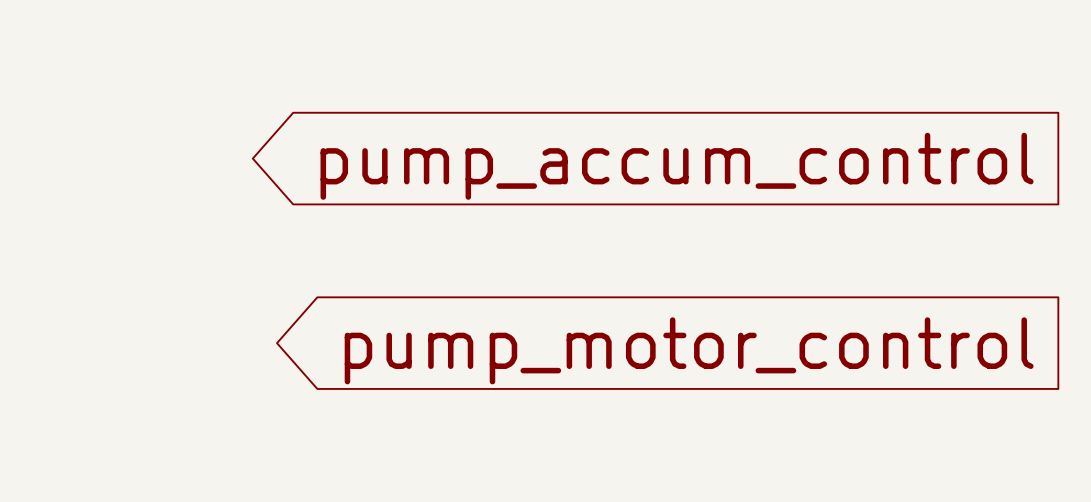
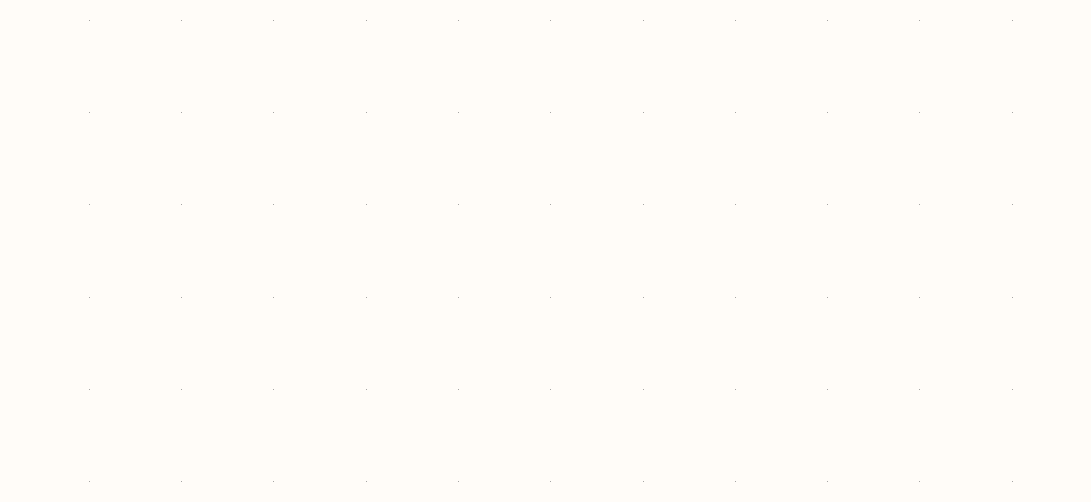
global label: pump_accum_control (677, 166) -> none
global label: pump_motor_control (689, 350) -> none

